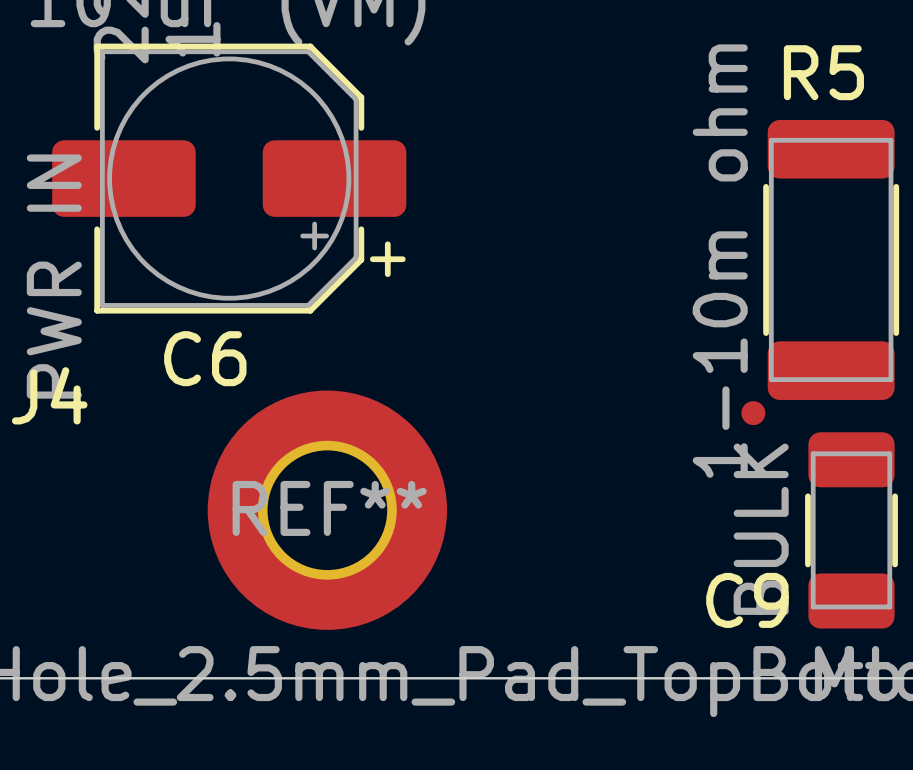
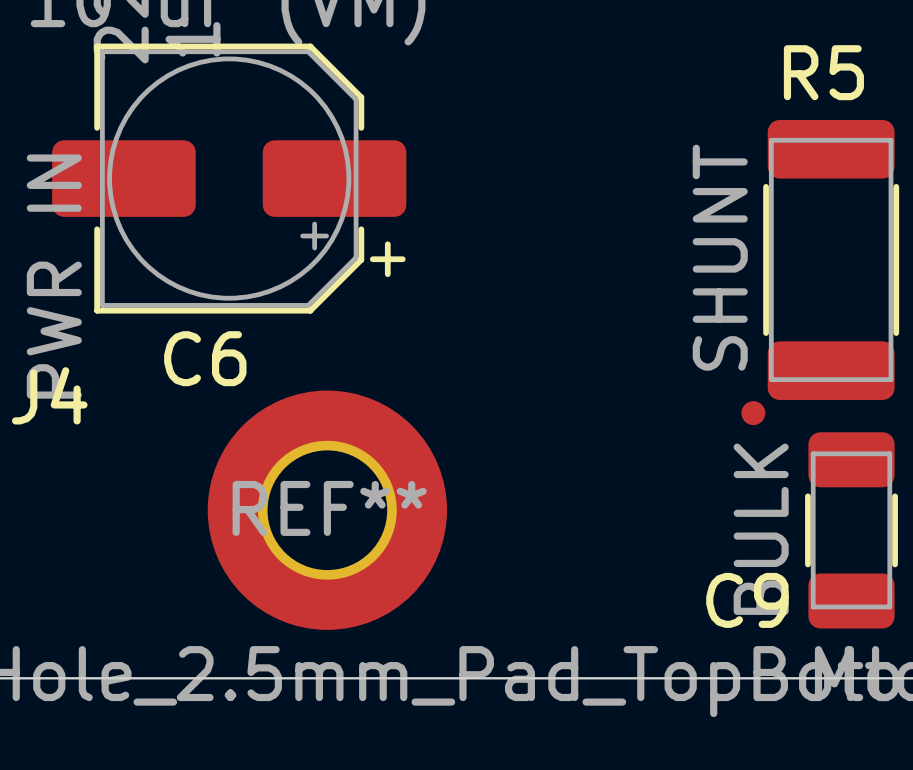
R5 value: 1-10m ohm (720, 261) -> SHUNT (720, 257)

